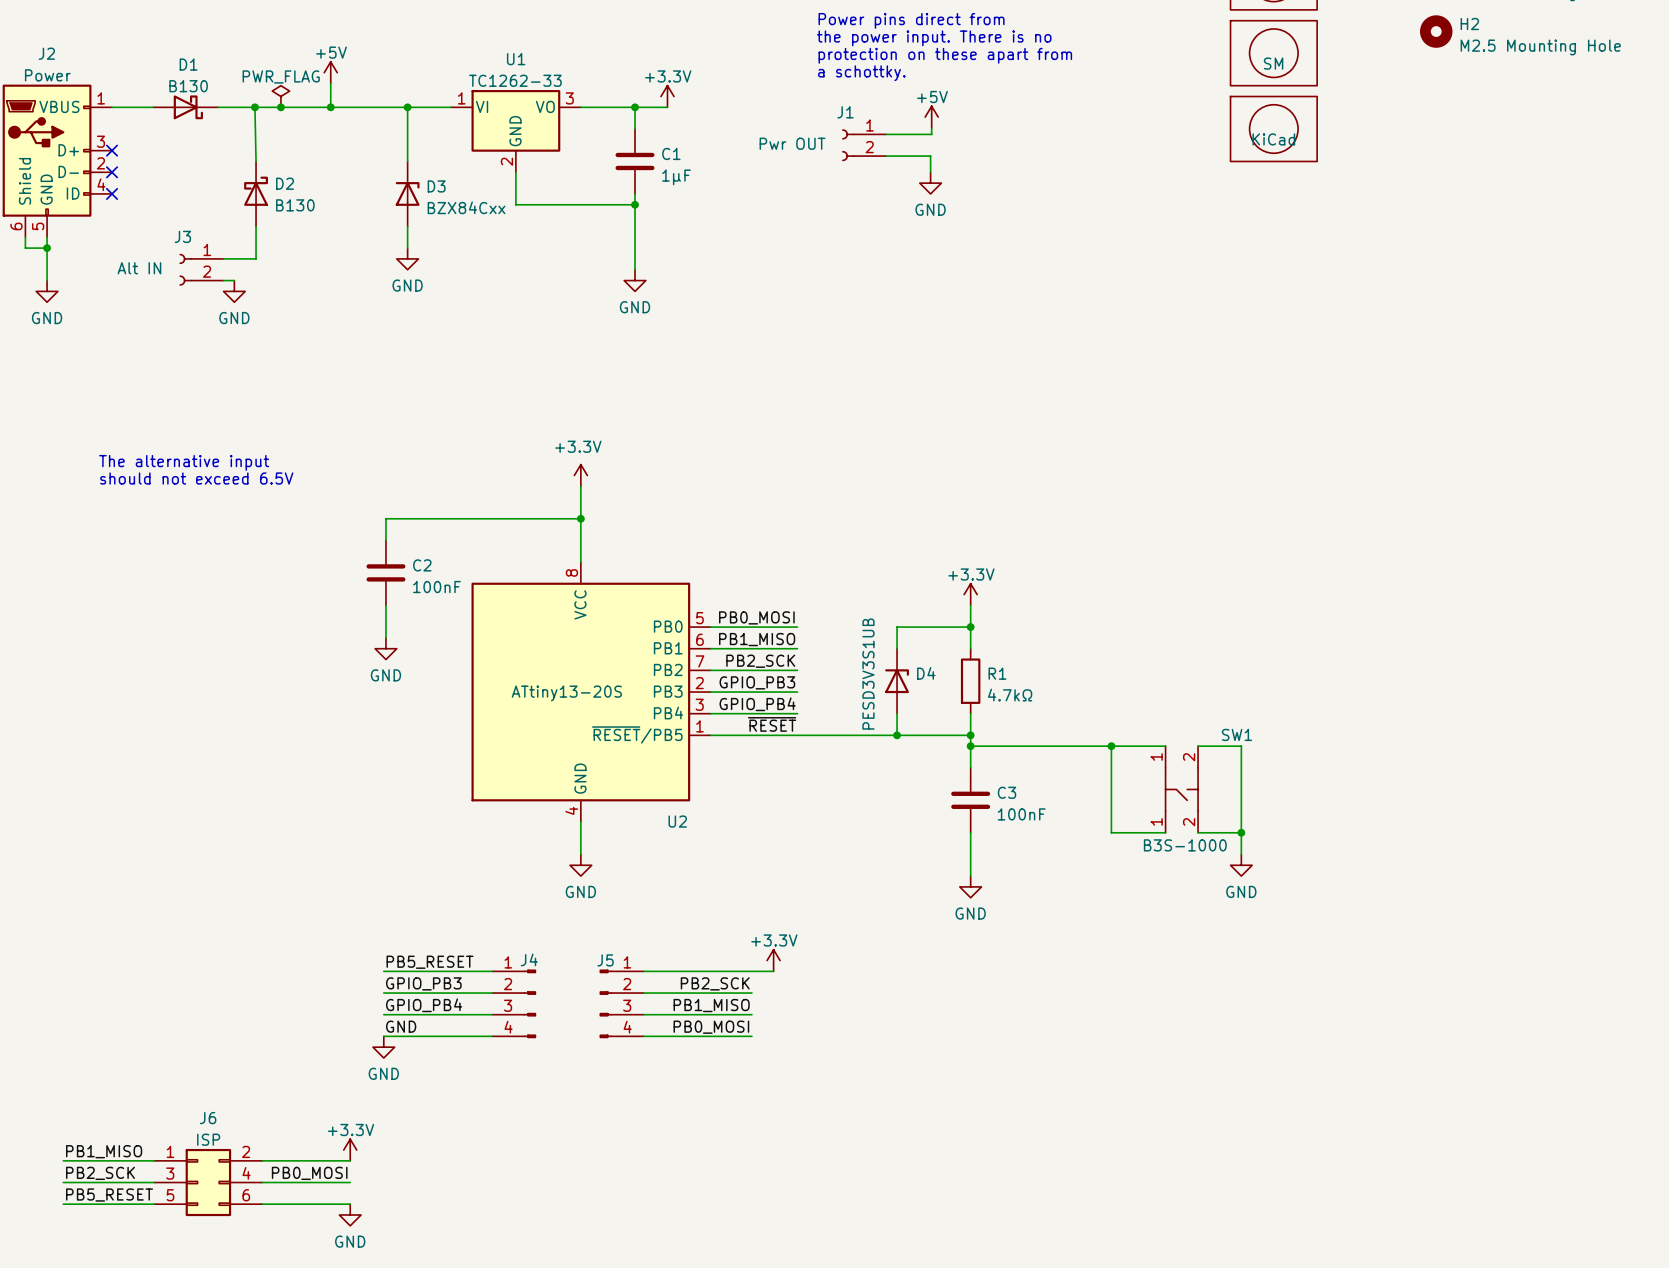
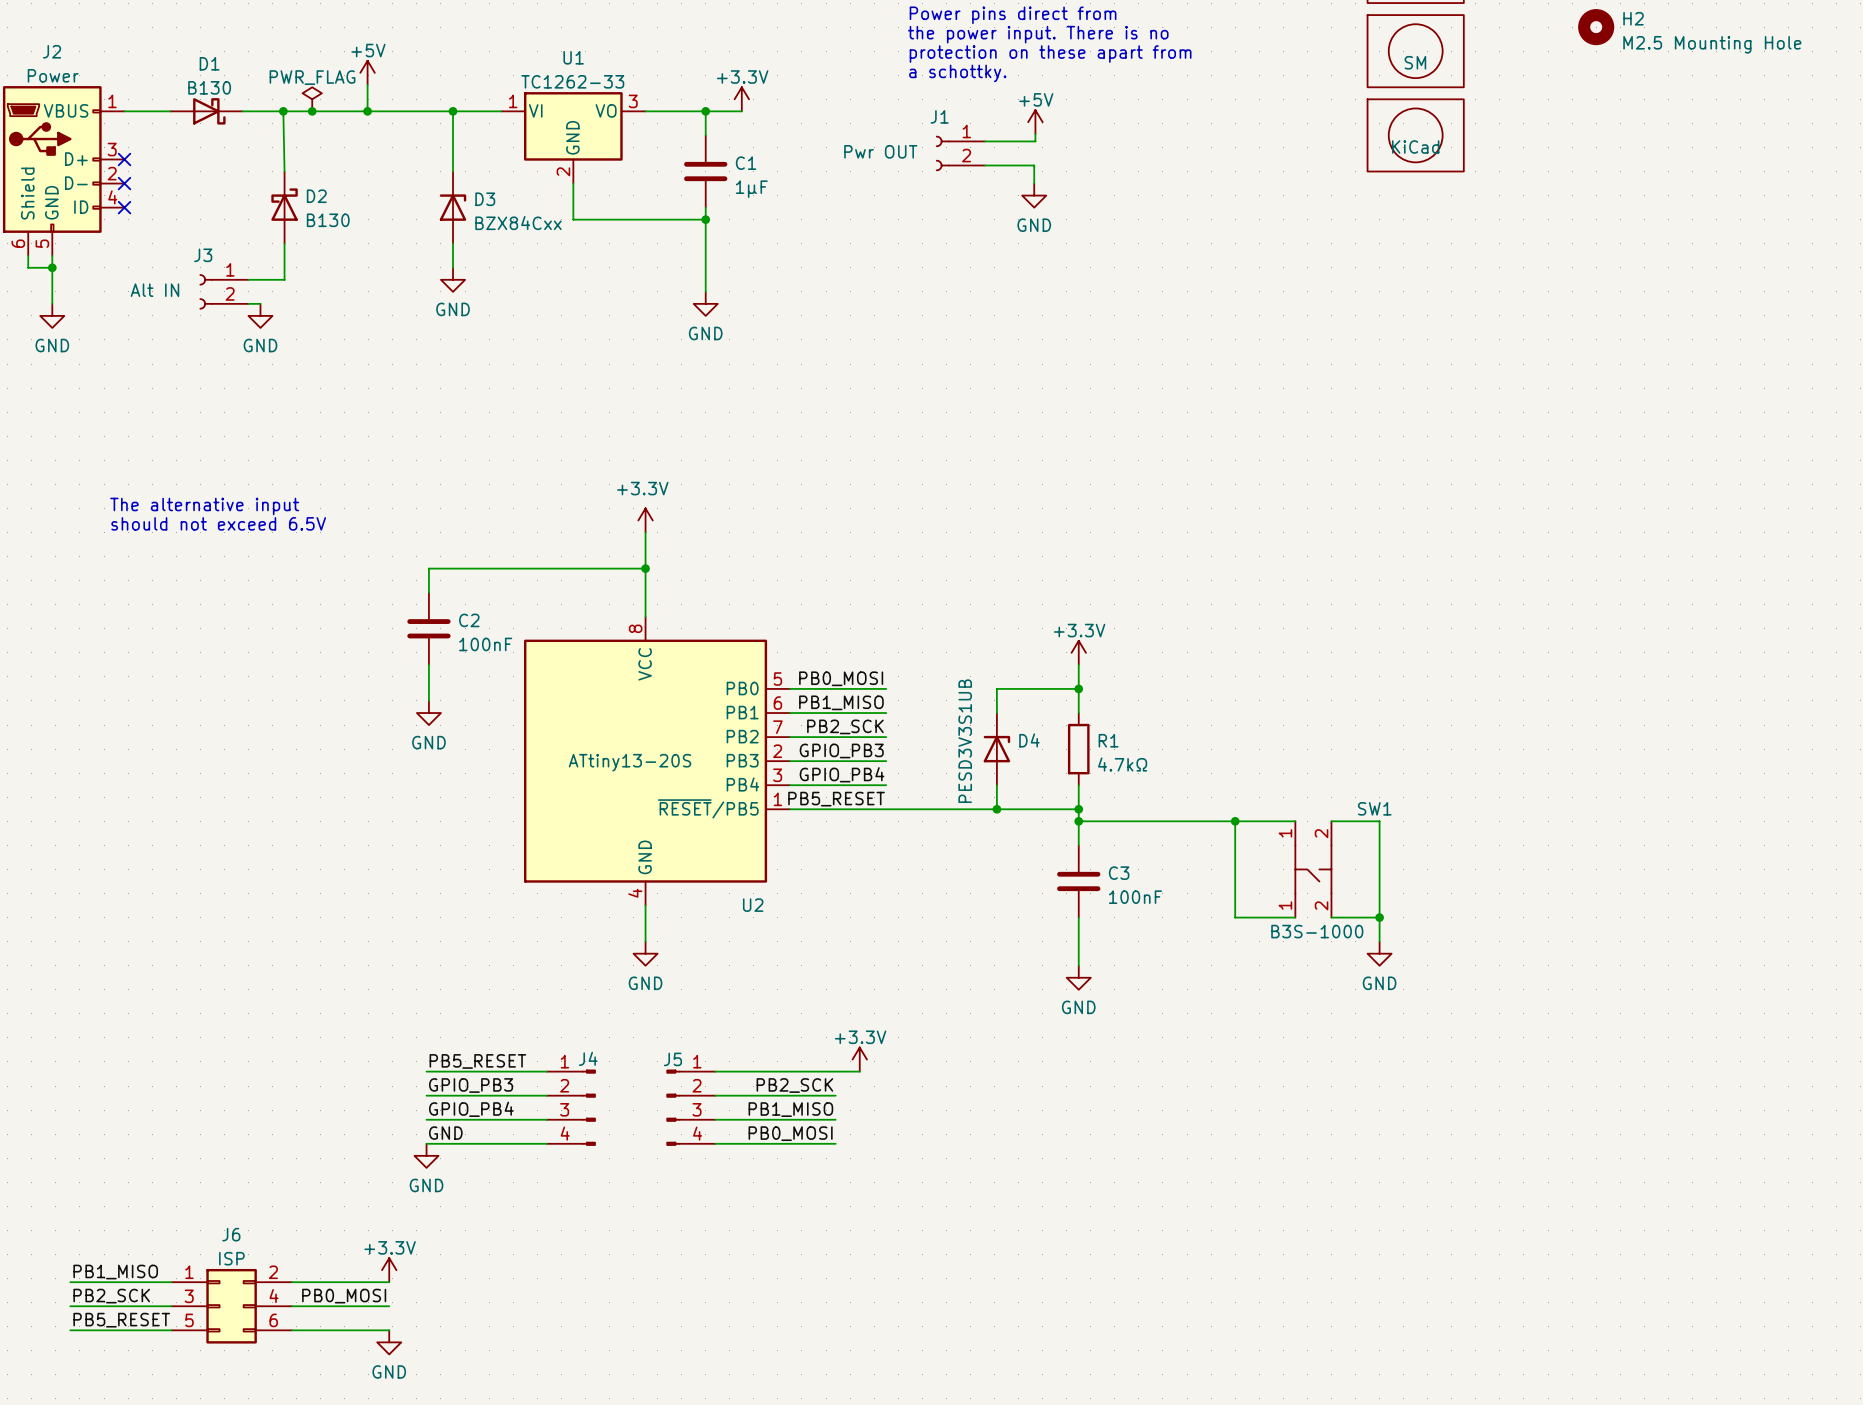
label: ~{RESET} (772, 724) -> PB5_RESET (836, 799)

